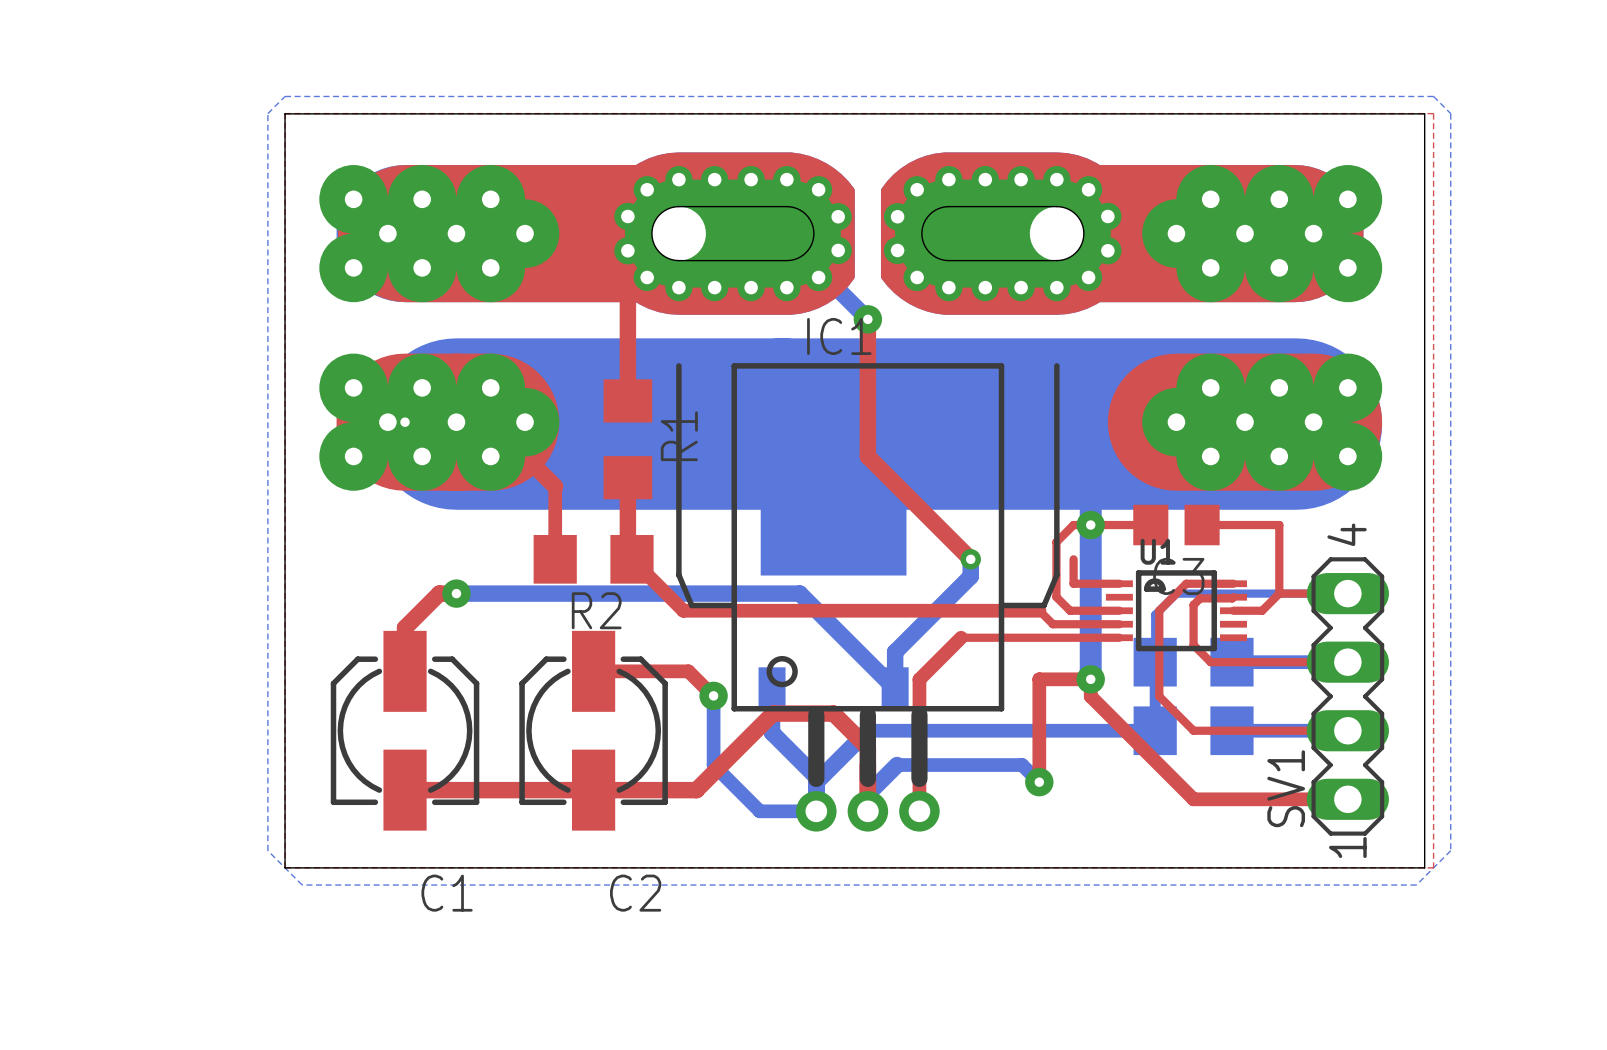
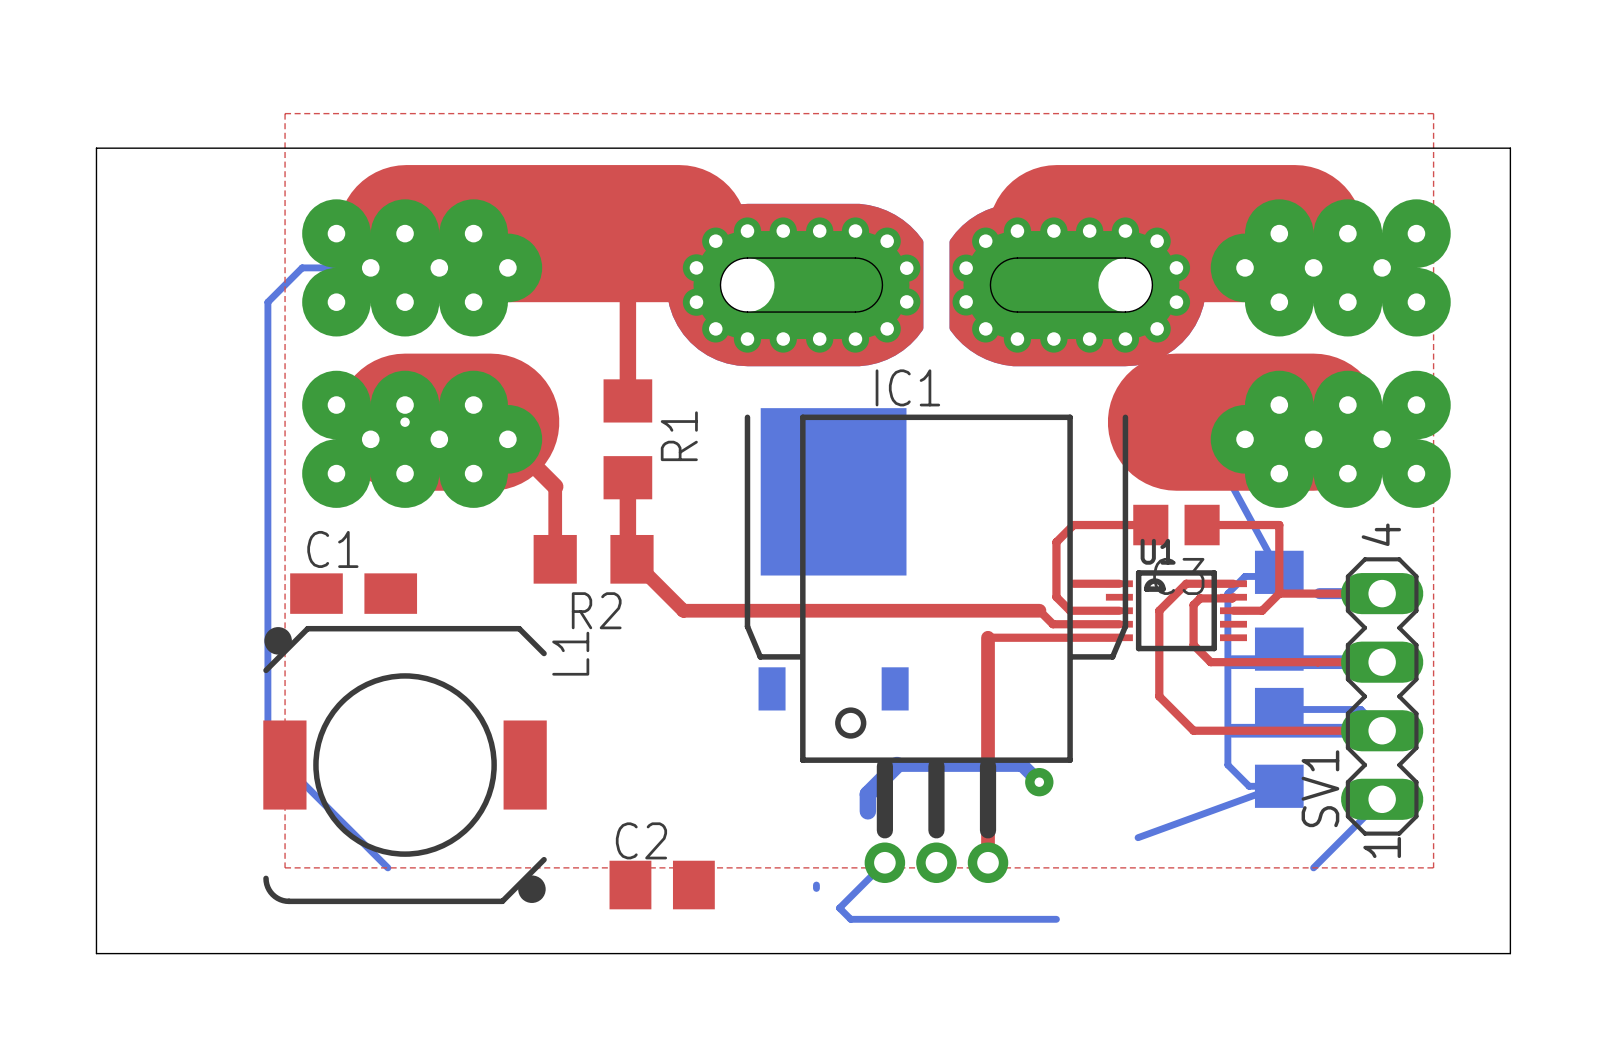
bottom zone outline: (285, 96) (1433, 96) (1450, 113) (1450, 850) (1416, 885) (302, 885) (267, 850) (267, 113) (285, 96) -> none
board edge: (285, 113) (1424, 113) (1424, 867) (285, 867) (285, 113) -> (96, 148) (96, 953) (1510, 953) (1510, 148) (96, 148)
part position: (439, 233) -> (422, 267)
part position: (1262, 233) -> (1330, 267)
bottom track: none -> (370, 267) (302, 267) (267, 302) (267, 747) (387, 867)
top track: (867, 319) (867, 456) (970, 559) -> none
via: (867, 319) -> none
part position: (439, 422) -> (422, 439)
part position: (1262, 422) -> (1330, 439)
bottom track: (456, 424) (1296, 424) (1140, 424) (1090, 473) (1090, 679) -> none
bottom track: none -> (1206, 439) (1279, 572) (1275, 576) (1245, 576) (1227, 593) (1227, 765) (1249, 786) (1279, 786) (1274, 791) (1265, 791) (1138, 837)
IC1 position: (867, 491) -> (936, 543)
via: (1090, 525) -> none
bottom track: (970, 559) (970, 576) (895, 652) (895, 688) (799, 593) (456, 593) -> none
via: (970, 559) -> none
top track: (1073, 559) (1073, 583) -> none
top track: (456, 593) (439, 593) (405, 627) (405, 671) -> none
via: (456, 593) -> none
bottom track: (1319, 593) (1176, 593) (1155, 614) (1155, 730) (867, 730) (816, 782) -> none
part: none -> (1279, 610)
C1 footprint: [330, 630, 480, 831] -> [290, 573, 418, 614]
C2 footprint: [519, 630, 668, 831] -> [609, 860, 715, 910]
top track: (988, 637) (961, 637) (919, 679) (919, 811) -> (988, 637) (988, 862)
part: (1193, 662) -> none
top track: (593, 671) (688, 671) (713, 695) -> none
via: (1090, 679) -> none
bottom track: (772, 688) (772, 732) (816, 777) (816, 811) (759, 811) (713, 765) (713, 695) -> none
via: (713, 695) -> none
SV1 position: (1347, 696) -> (1382, 696)
bottom track: none -> (1279, 709) (1360, 709) (1382, 730)
part: (1193, 730) -> none
part: none -> (1279, 747)
L1: none -> (405, 765)
top track: (1039, 782) (1039, 679) (1090, 679) (1090, 696) (1193, 799) (1347, 799) -> none
top track: (405, 790) (696, 790) (772, 713) (833, 713) (867, 747) (867, 811) -> none
bottom track: none -> (1382, 799) (1313, 867)
bottom track: none -> (884, 862) (839, 908) (850, 919) (1056, 919)
bottom track: none -> (816, 885) (816, 888)
C1 name position: C1 (447, 893) -> C1 (332, 549)
C2 name position: C2 (635, 893) -> C2 (641, 840)

